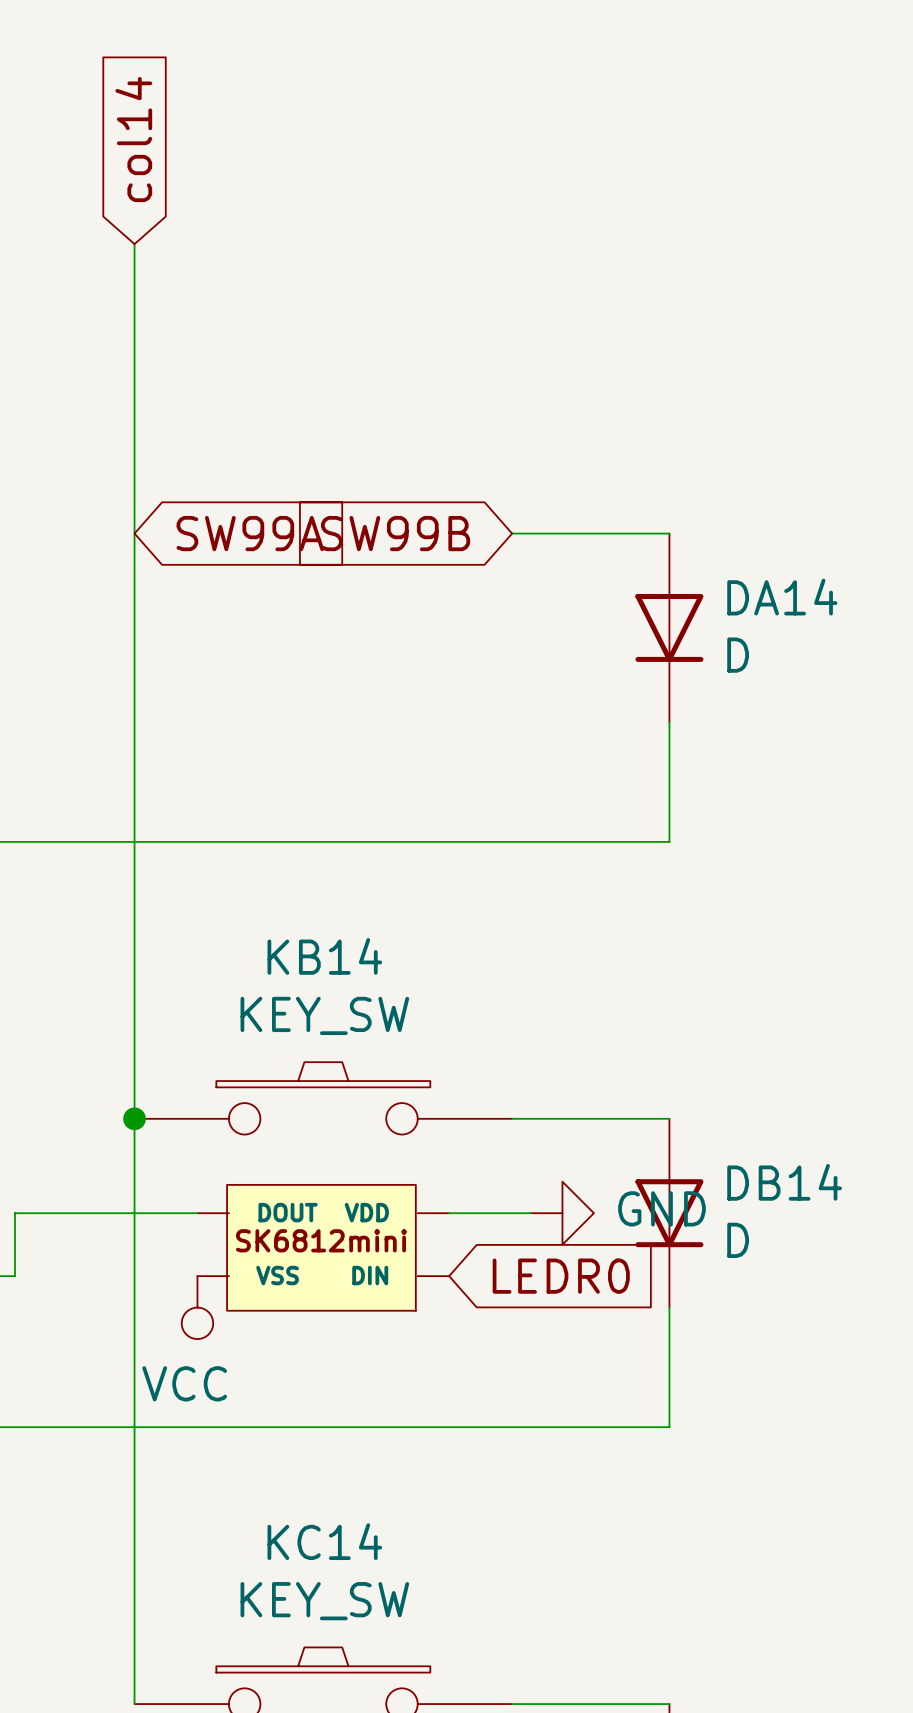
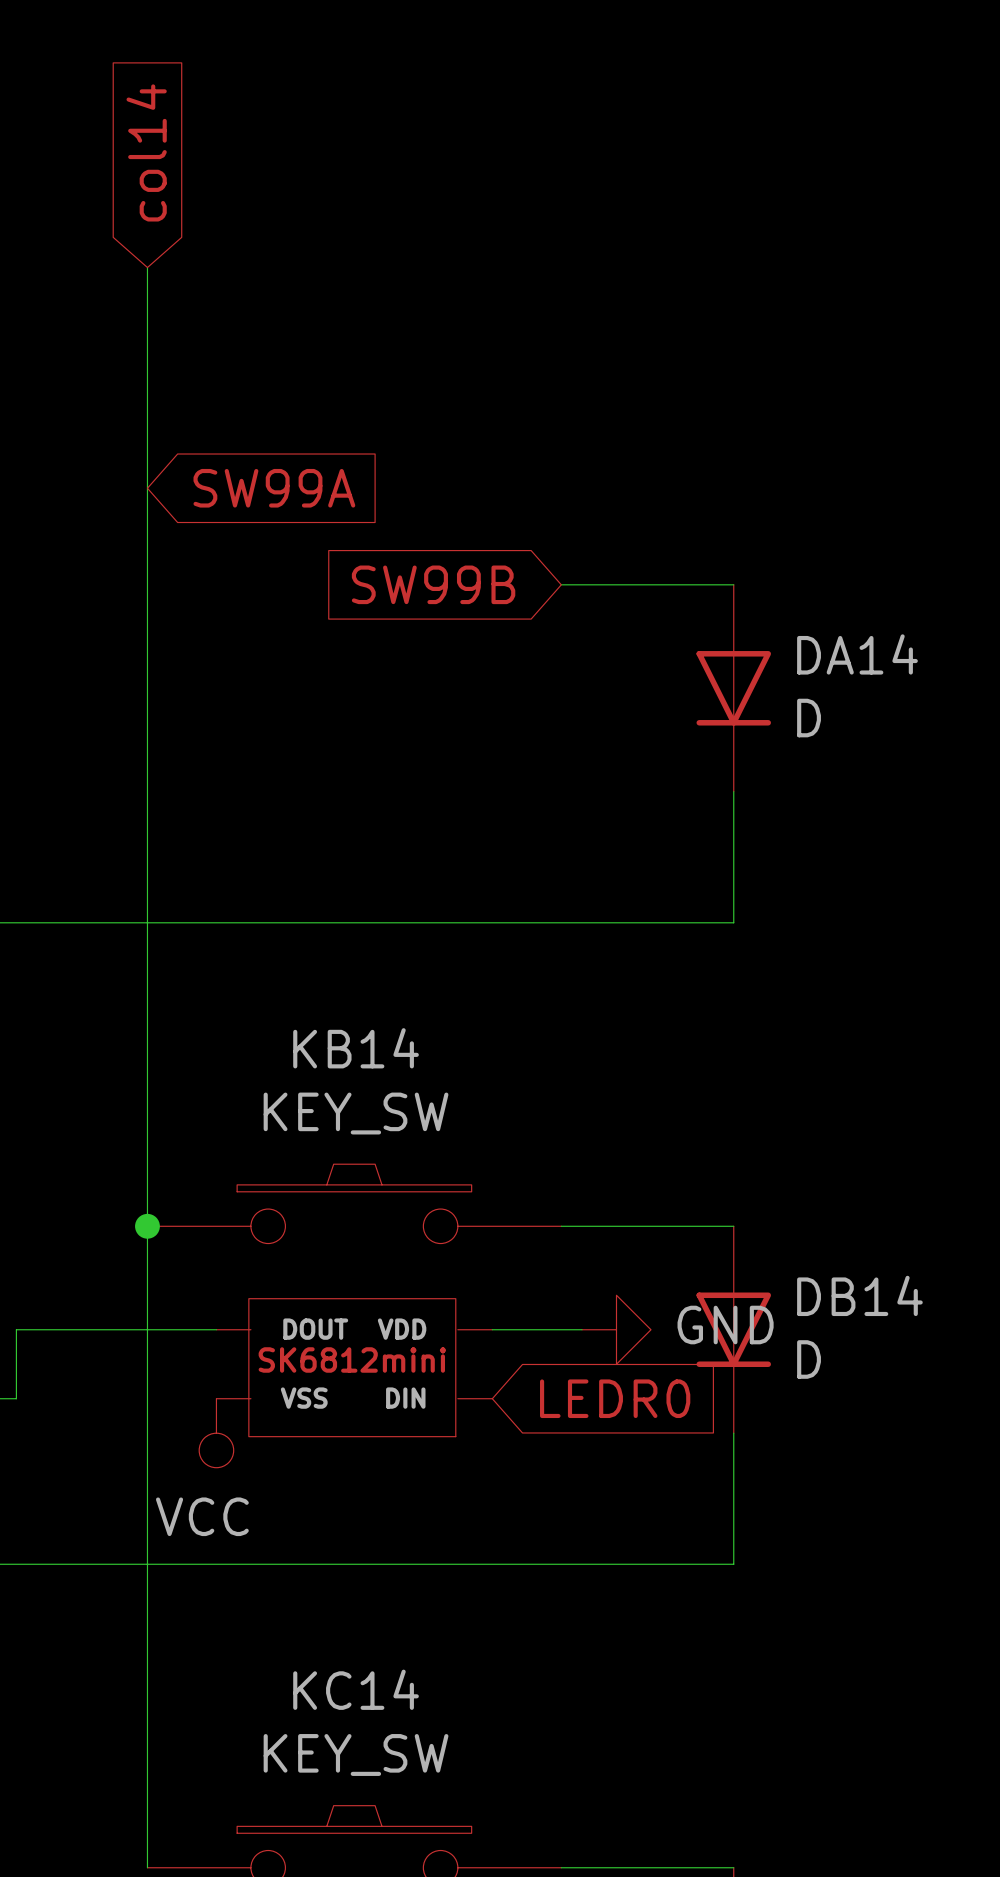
global label position: SW99A (250, 533) -> SW99A (274, 488)

